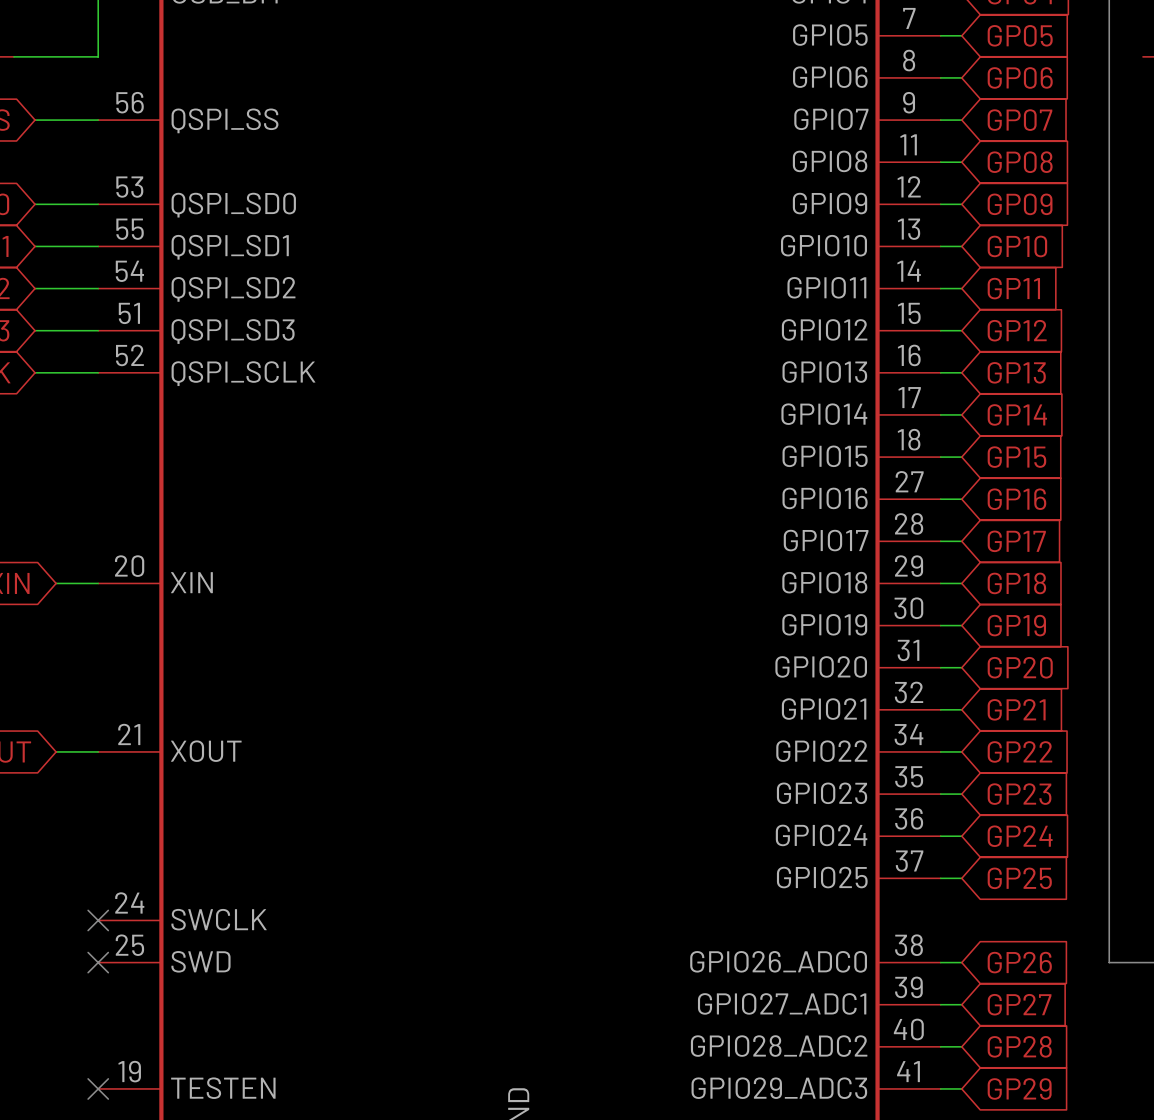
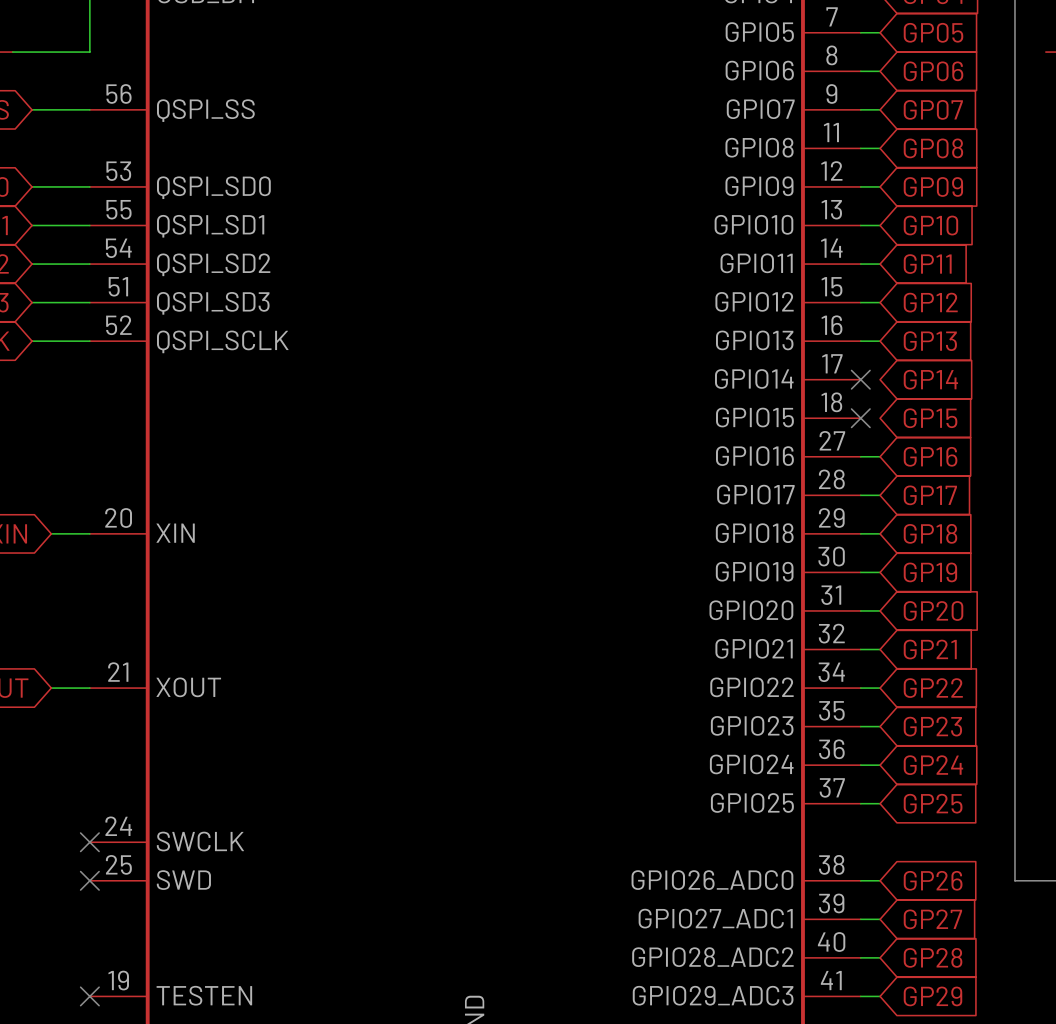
wire: (940, 414) (961, 414) -> none
no-connect mark: none -> (860, 379)
wire: (940, 457) (961, 457) -> none
no-connect mark: none -> (860, 418)

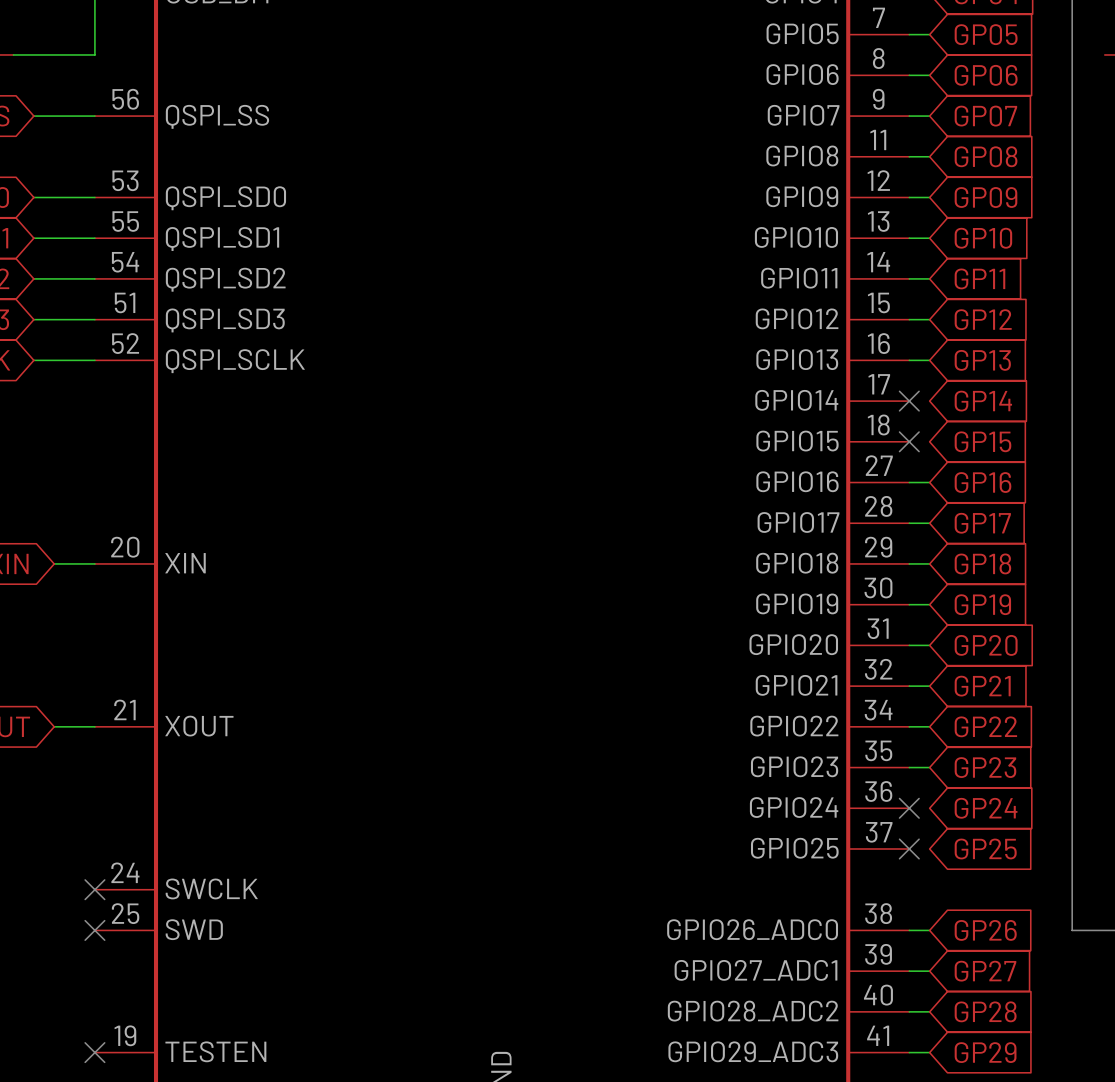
wire: (860, 765) (880, 765) -> none
no-connect mark: none -> (909, 808)
wire: (860, 803) (880, 803) -> none
no-connect mark: none -> (909, 849)

